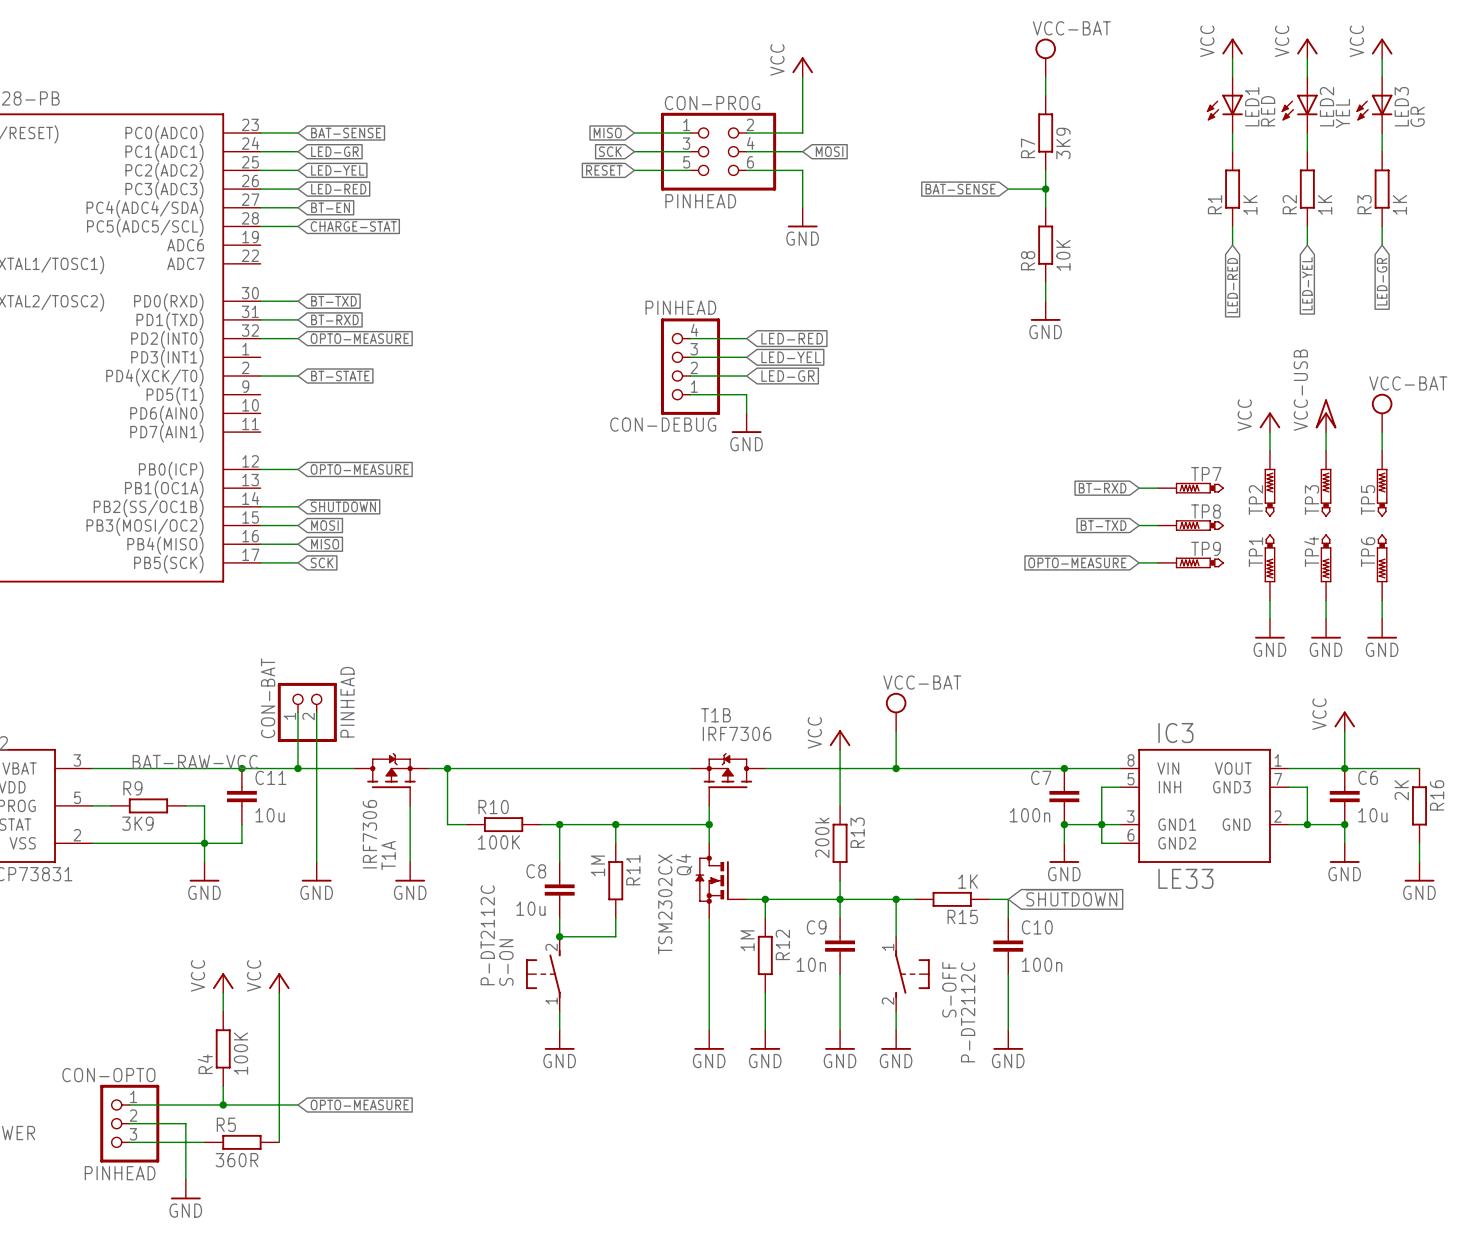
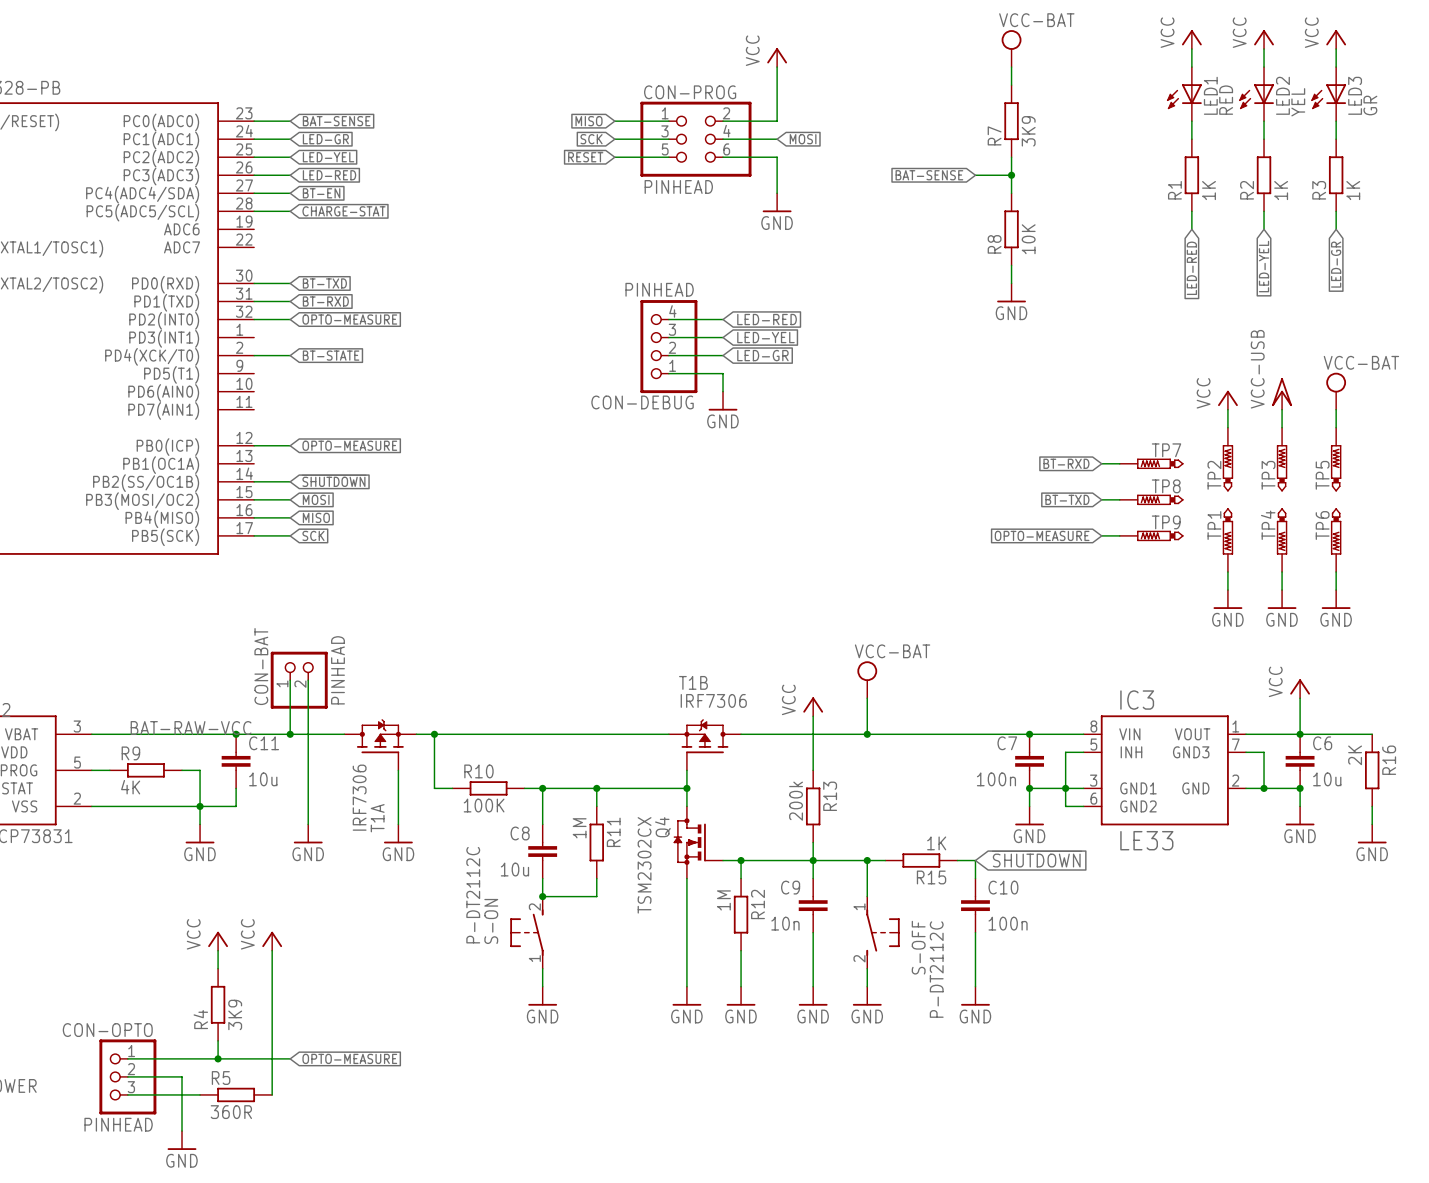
R9 value: 3K9 (137, 823) -> 4K (130, 787)
R4 value: 100K (240, 1053) -> 3K9 (235, 1014)

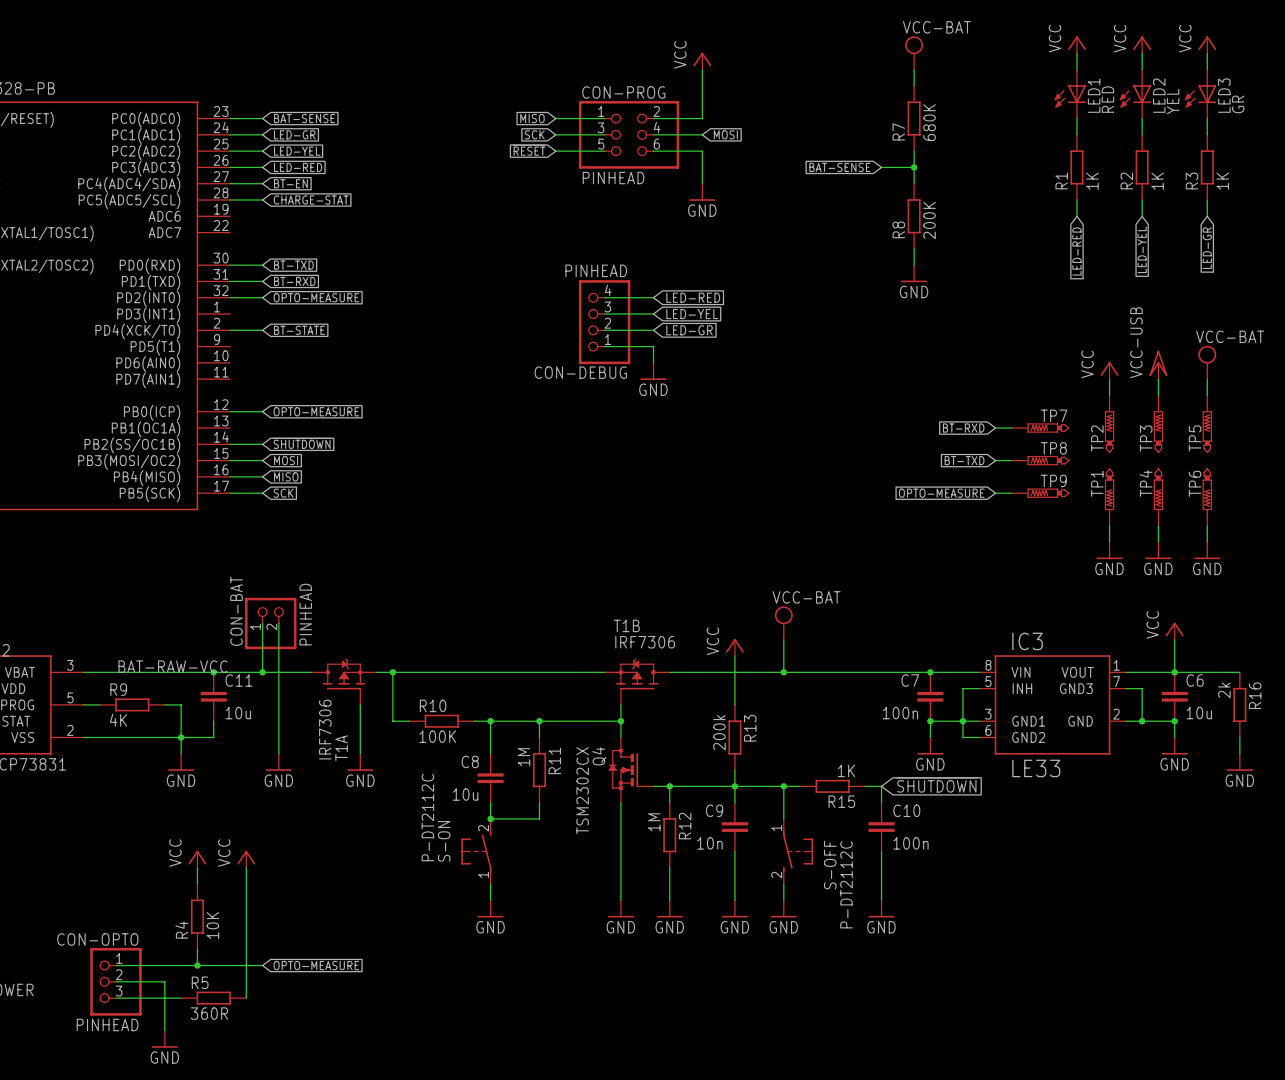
R7 value: 3K9 (1028, 131) -> 680K (929, 122)
R8 value: 10K (1028, 239) -> 200K (929, 220)
R16 value: 2K (1355, 755) -> 2k (1224, 690)
R4 value: 3K9 (235, 1014) -> 10K (212, 925)

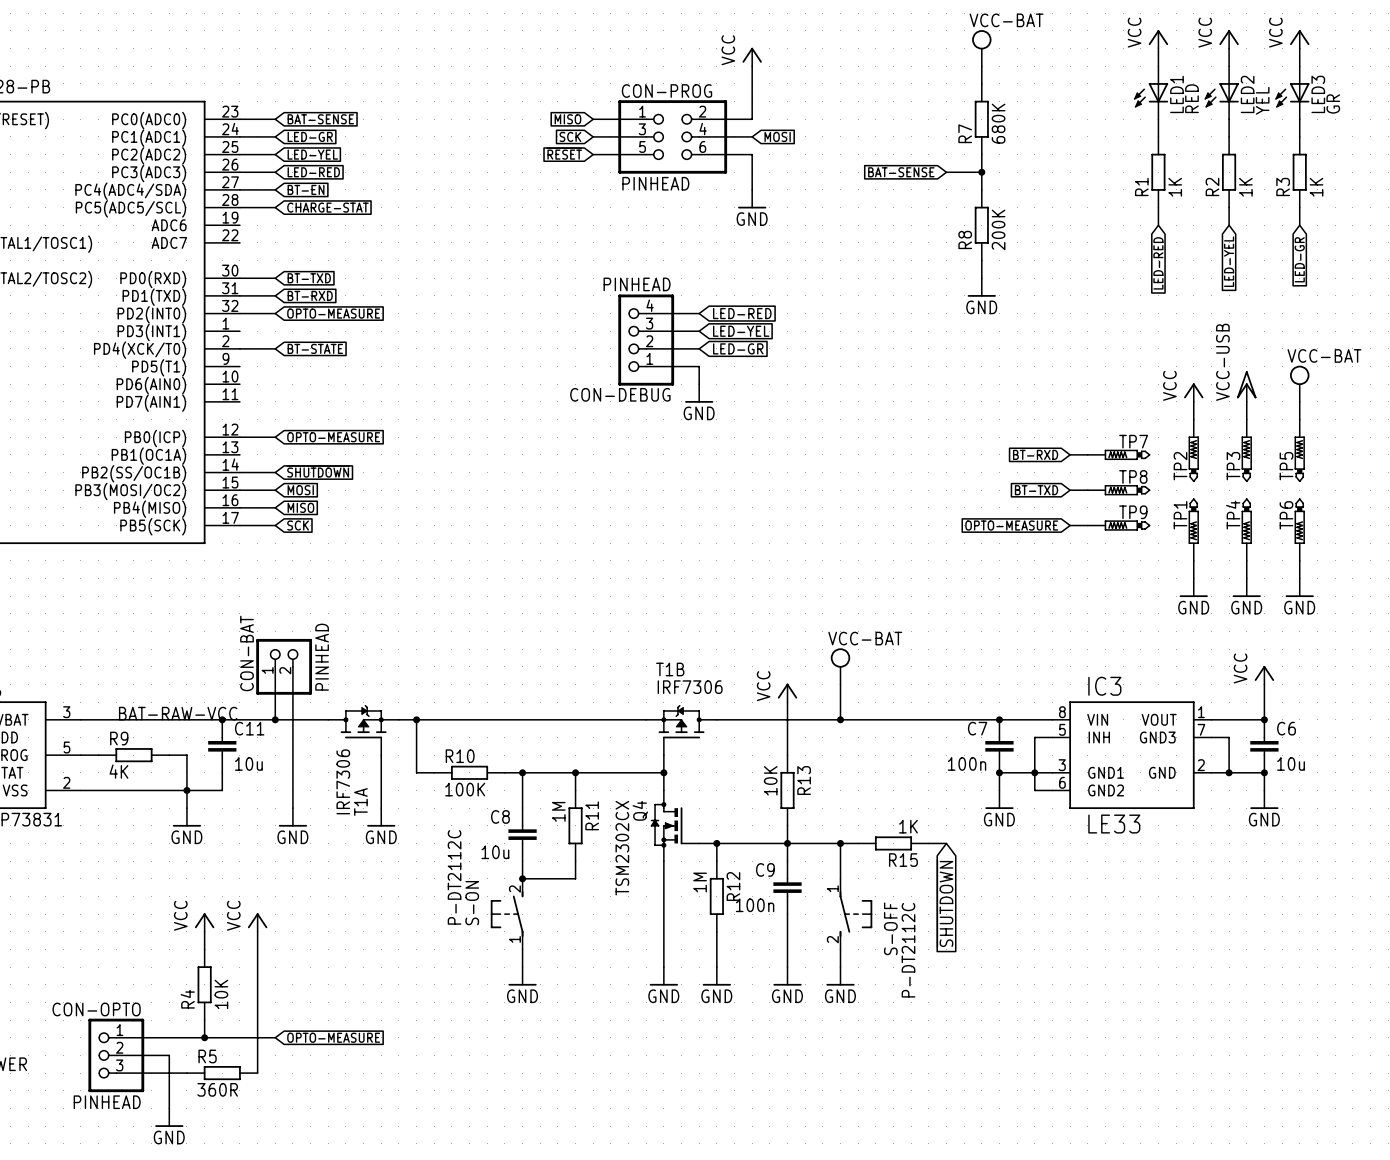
wire: (1174, 672) (1239, 672) -> none
R16: 2k (1239, 704) -> none
R13 value: 200k (719, 732) -> 10K (770, 780)
wire: (1239, 737) (1239, 753) -> none
power symbol: GND (1239, 762) -> none
global label rotation: 0° (937, 785) -> 90° clockwise (945, 903)
wire: (881, 786) (881, 802) -> none
C10: 100n (881, 827) -> none
C9 value: 10n (709, 843) -> 100n (755, 905)
wire: (881, 851) (881, 900) -> none
power symbol: GND (881, 908) -> none

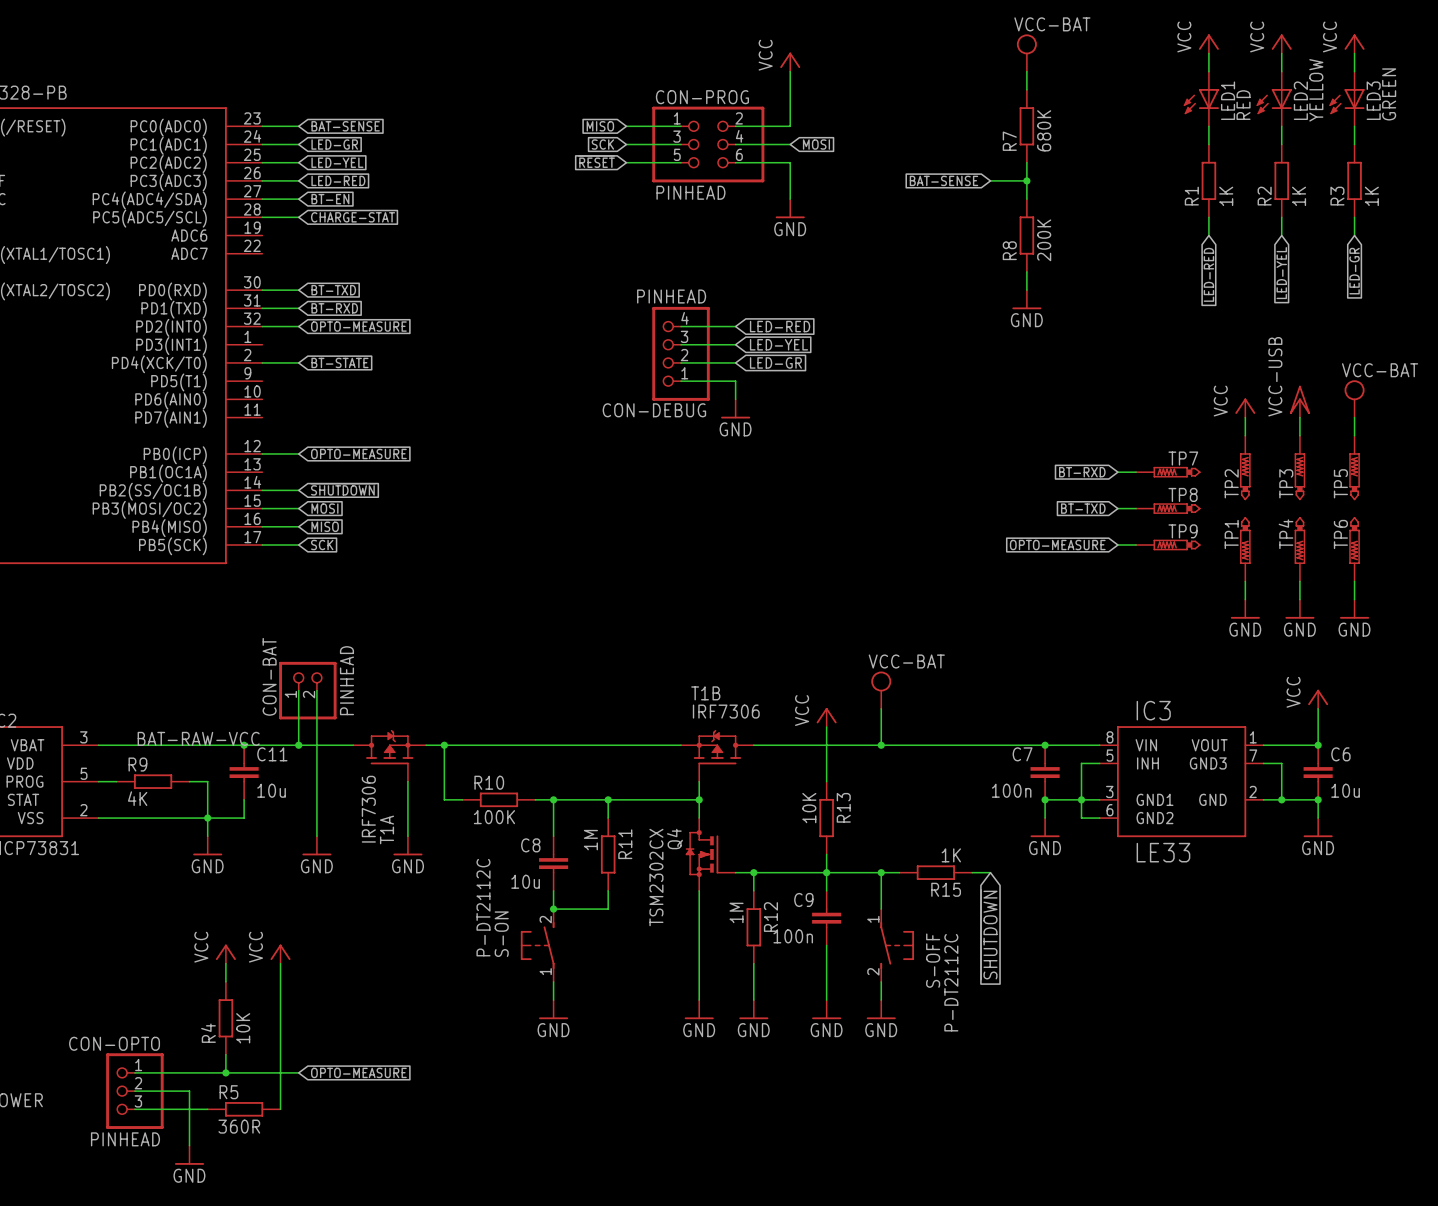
LED2 value: YEL (1262, 100) -> YELLOW (1316, 90)
LED3 value: GR (1333, 103) -> GREEN (1389, 94)

